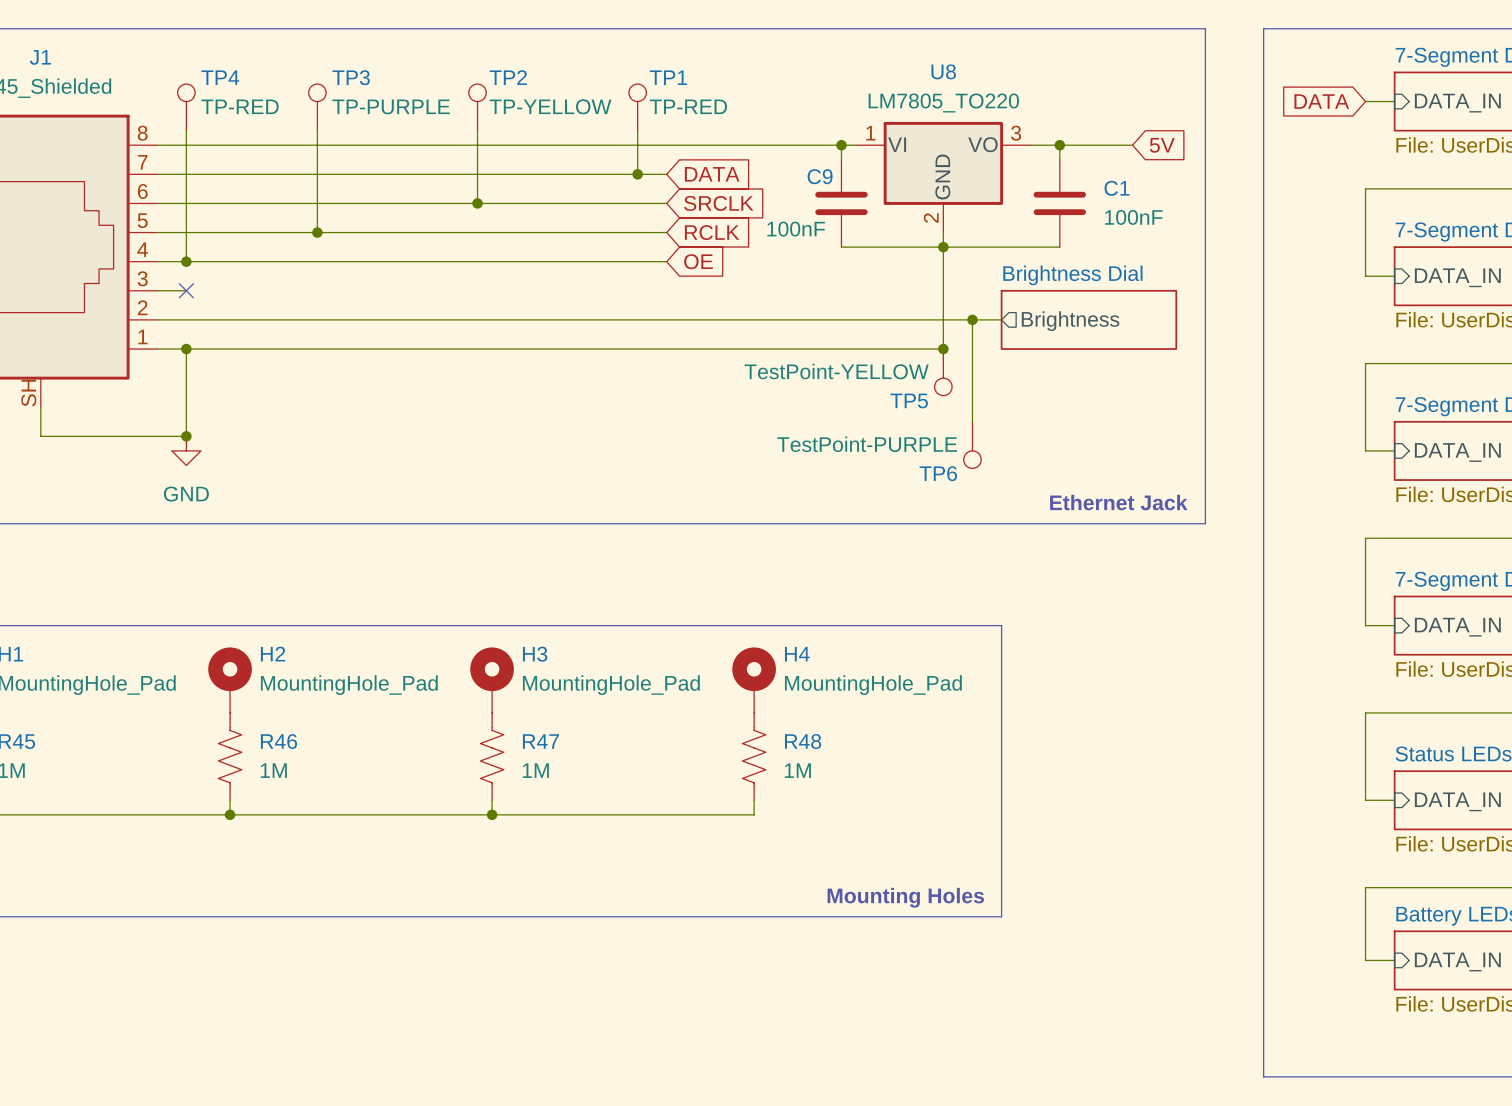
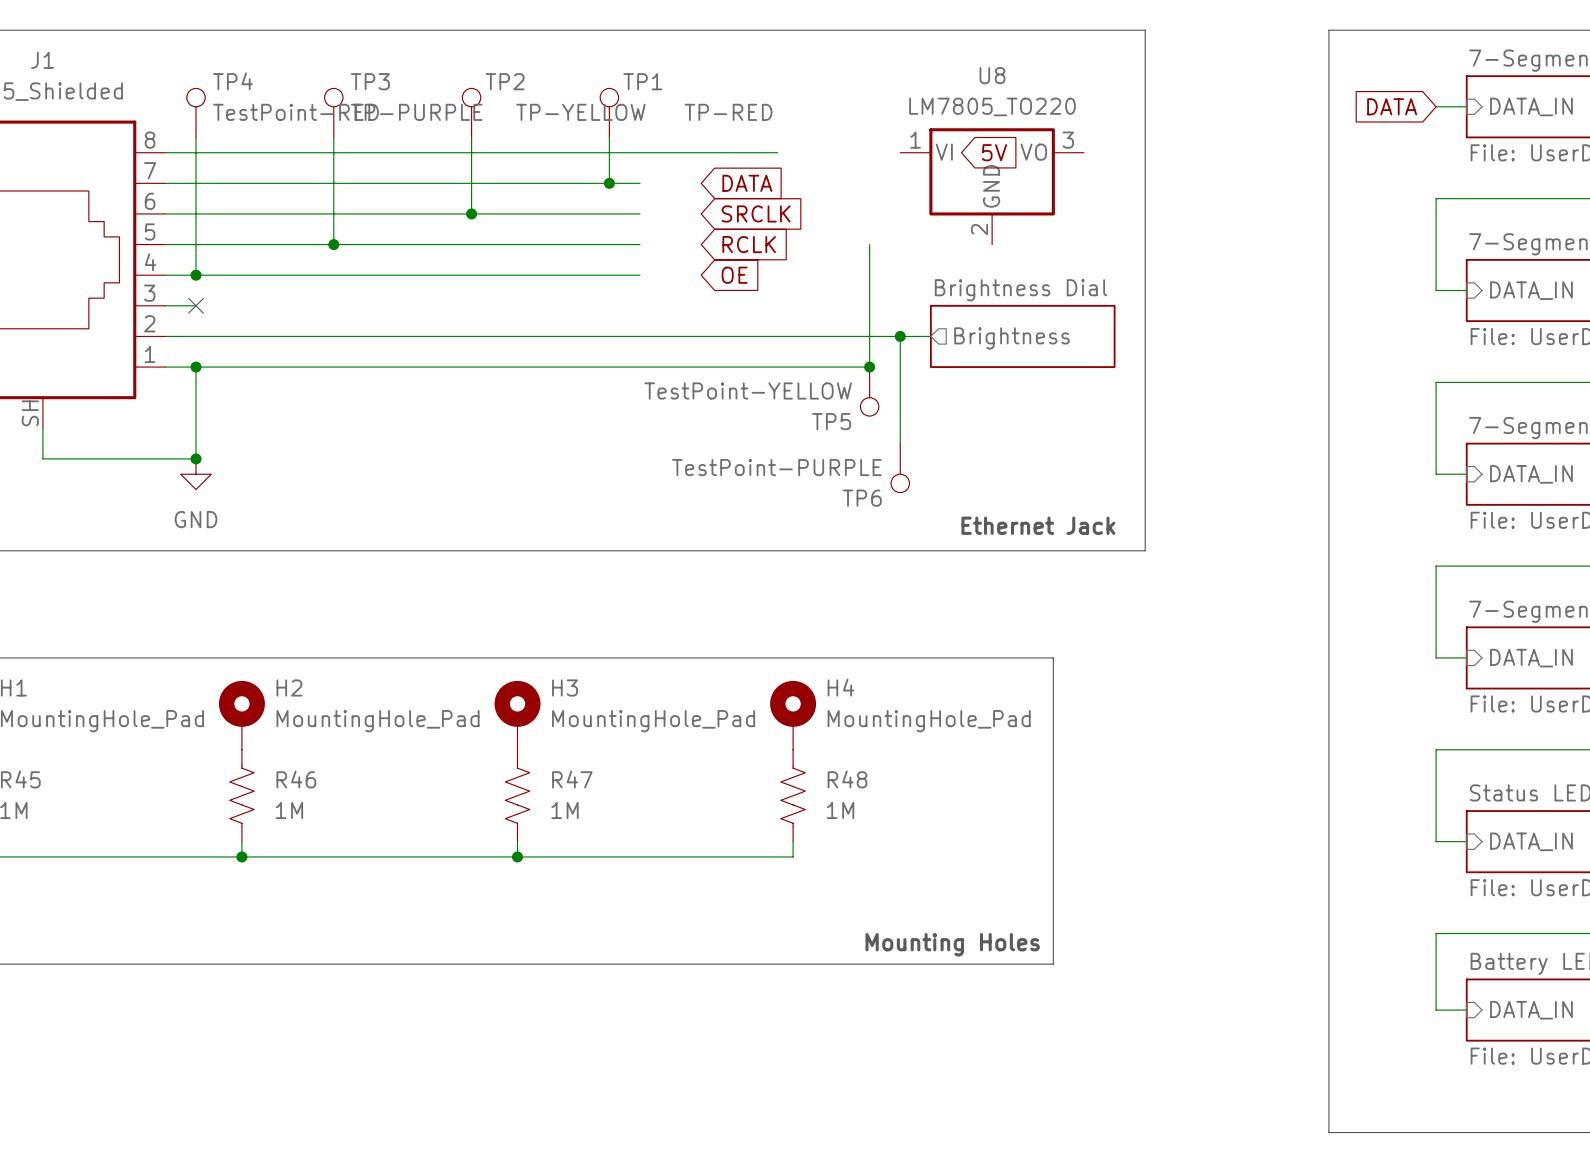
line: (1088, 28) (1205, 28) (1205, 523) (1088, 523) -> (1145, 30) (1145, 550)
TP4 value: TP-RED (240, 106) -> TestPoint-RED (296, 112)
TP2 position: (477, 107) -> (471, 112)
TP1 position: (637, 107) -> (609, 112)
wire: (477, 130) (477, 203) -> (471, 137) (471, 213)
wire: (637, 130) (637, 174) -> (609, 137) (609, 183)
wire: (739, 145) (856, 145) -> none
wire: (841, 145) (841, 159) -> none
junction: (841, 145) -> none
wire: (1030, 145) (1132, 145) -> none
wire: (1059, 145) (1059, 159) -> none
junction: (1059, 145) -> none
global label position: 5V (1162, 145) -> 5V (994, 152)
junction: none -> (609, 183)
wire: (608, 174) (666, 174) -> none
junction: (637, 174) -> none
junction position: (477, 203) -> (471, 213)
wire: (608, 203) (666, 203) -> none
C9: 100nF (841, 203) -> none
C1: 100nF (1059, 203) -> none
wire: (608, 232) (666, 232) -> none
wire: (943, 232) (943, 349) (826, 349) -> (869, 244) (869, 367)
wire: (841, 247) (1059, 247) -> none
junction: (943, 247) -> none
wire: (608, 261) (666, 261) -> none
junction: none -> (900, 336)
wire: (885, 319) (1001, 319) -> none
wire: (972, 319) (972, 421) -> (900, 336) (900, 443)
junction: (972, 319) -> none
sheet Brightness Dial position: (1088, 319) -> (1022, 336)
sheet pin position: Brightness (1070, 321) -> Brightness (1012, 338)
junction: none -> (869, 367)
junction: (943, 349) -> none
TP5 position: (943, 372) -> (869, 391)
TP6 position: (972, 445) -> (900, 468)
text position: Ethernet Jack (1118, 502) -> Ethernet Jack (1038, 525)

